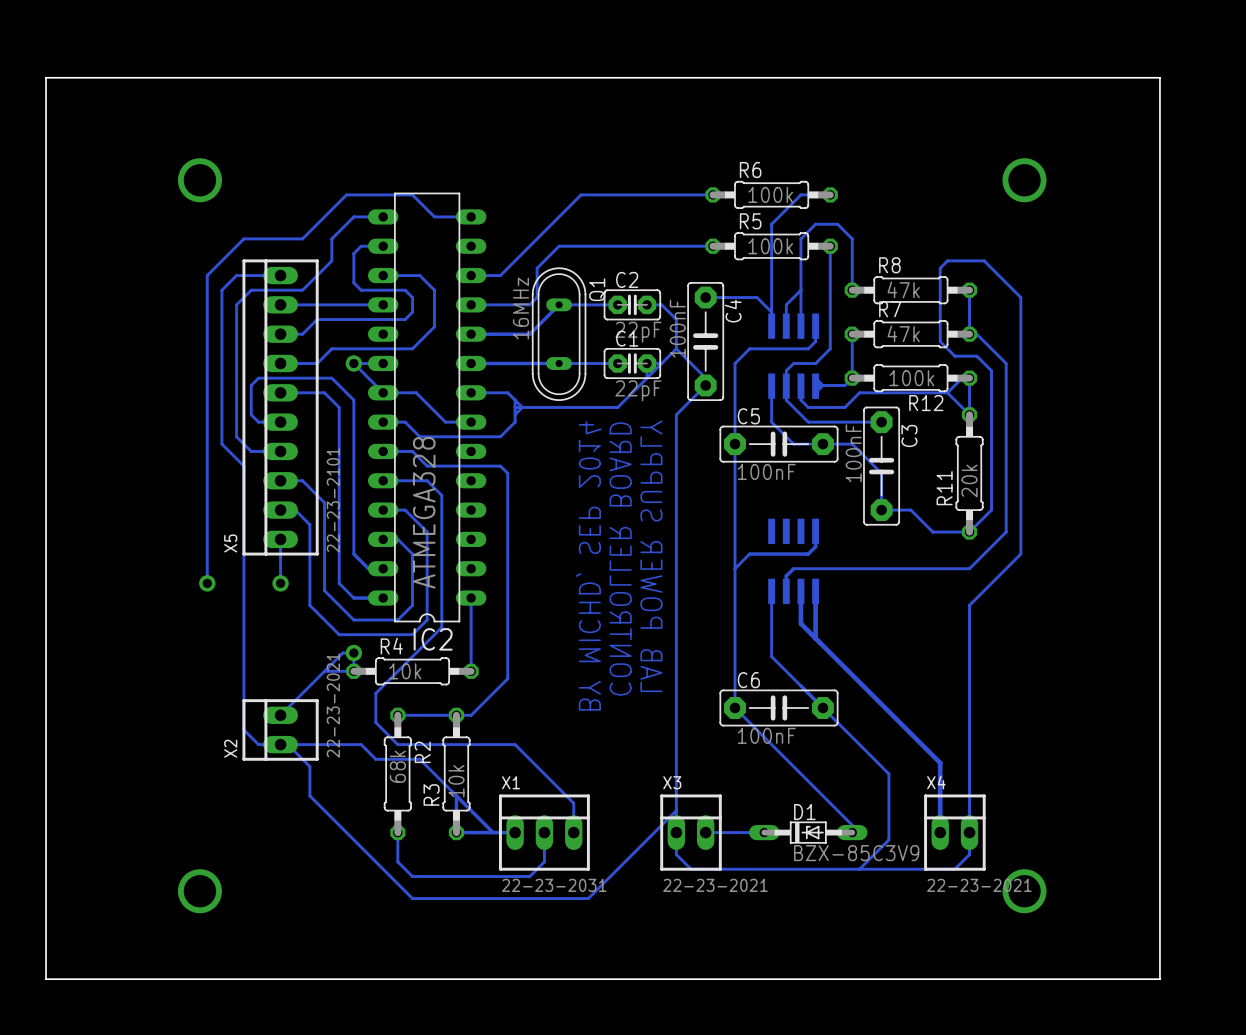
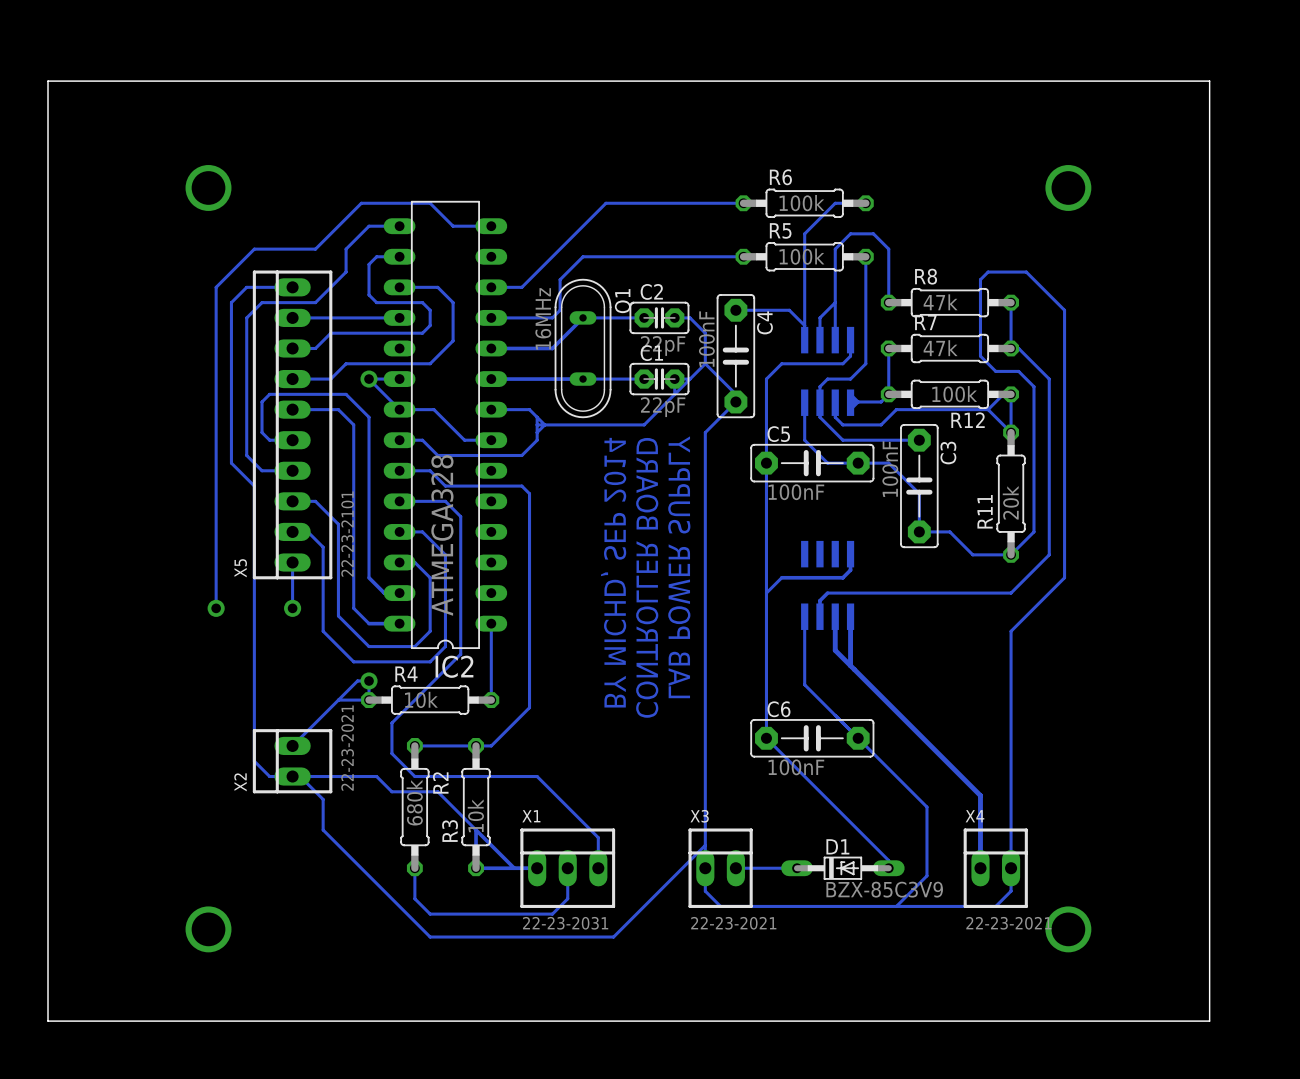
R2 value: 68k (397, 766) -> 680k (414, 802)

